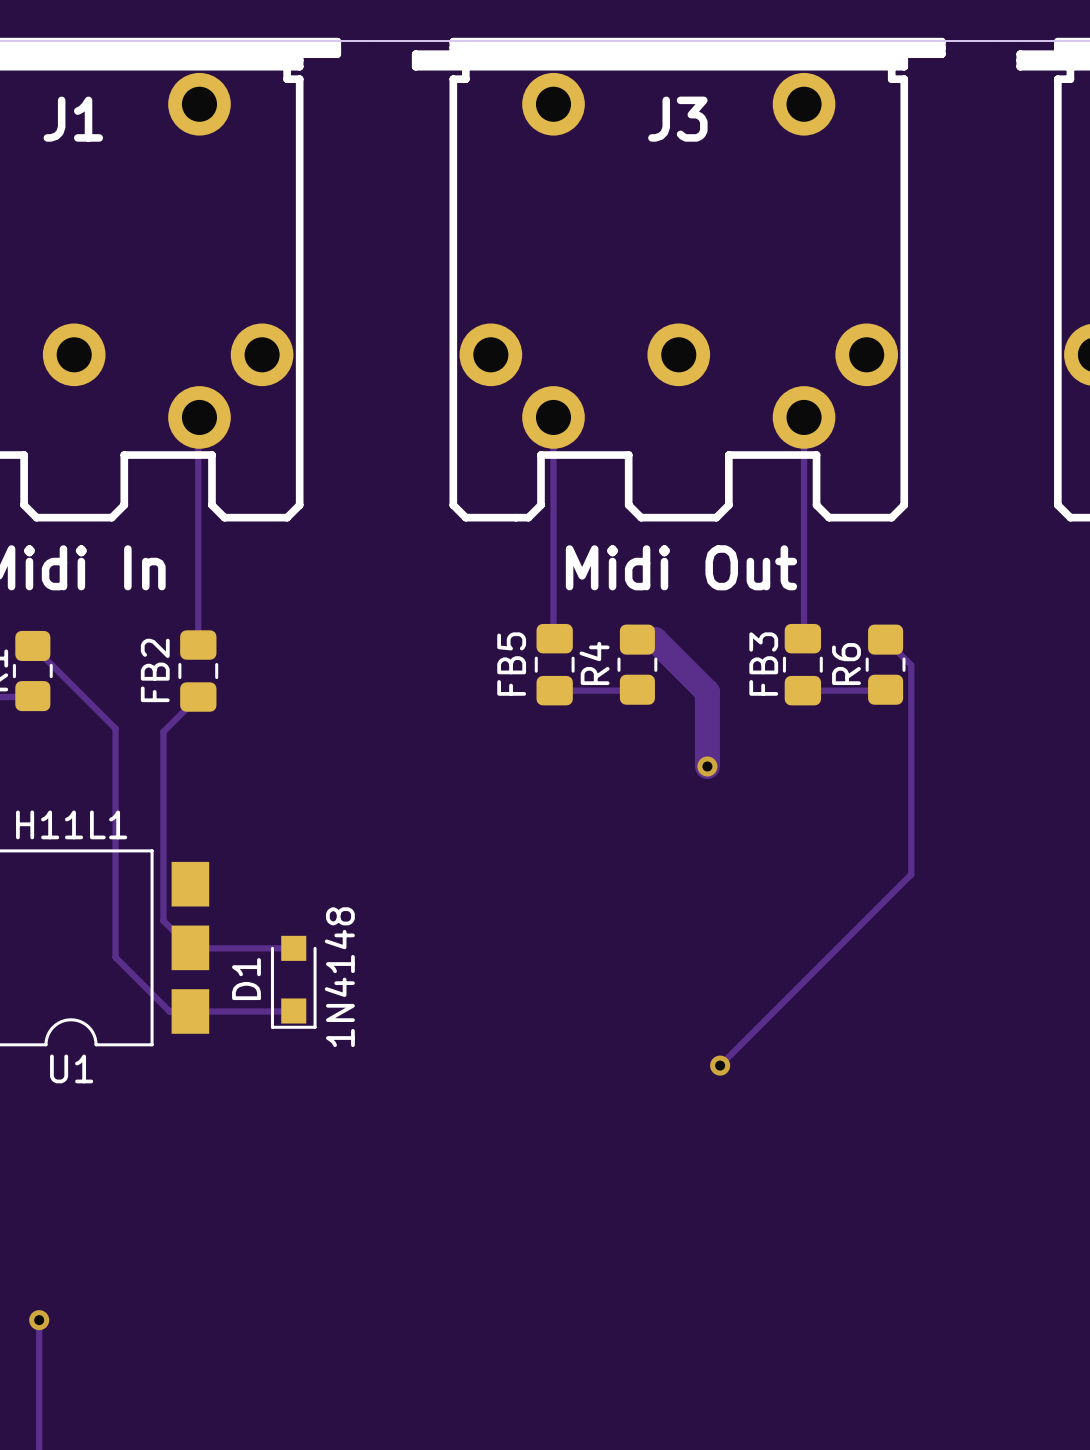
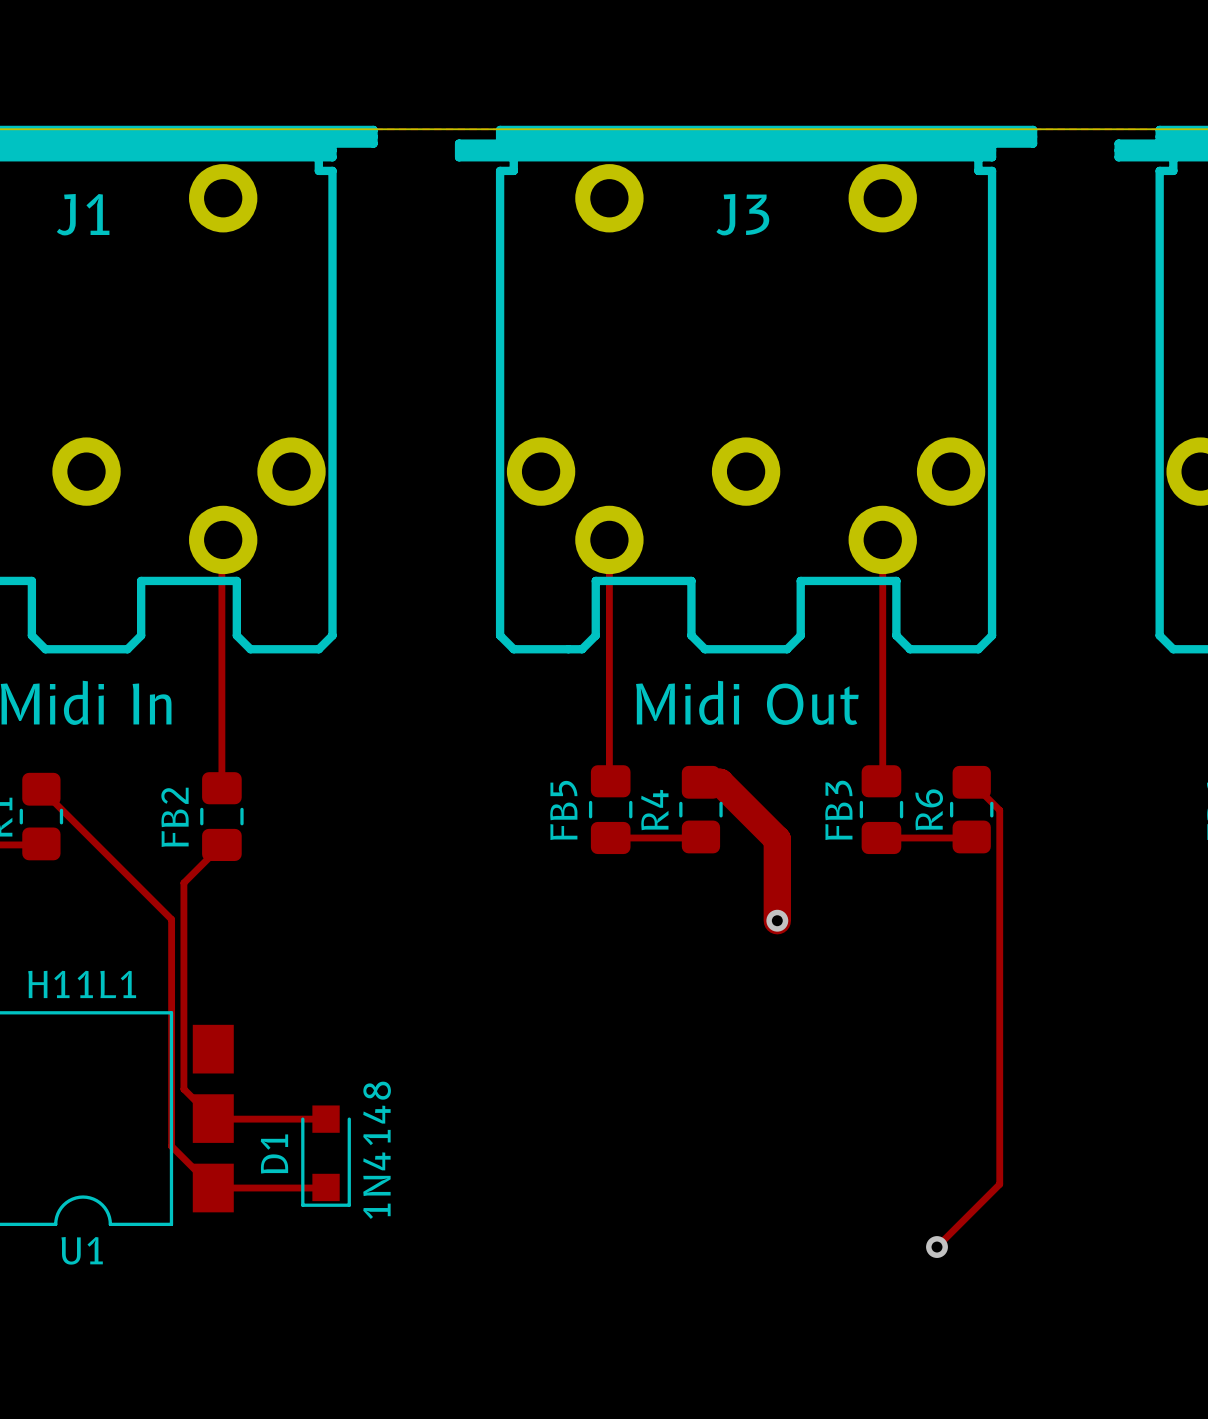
track: (115, 728) (115, 957) (169, 1011) (190, 1011) -> (131, 879) (171, 919) (171, 1146) (213, 1188)
track: (911, 874) (720, 1065) -> (999, 1038) (999, 1184) (937, 1247)
via position: (720, 1065) -> (937, 1247)

